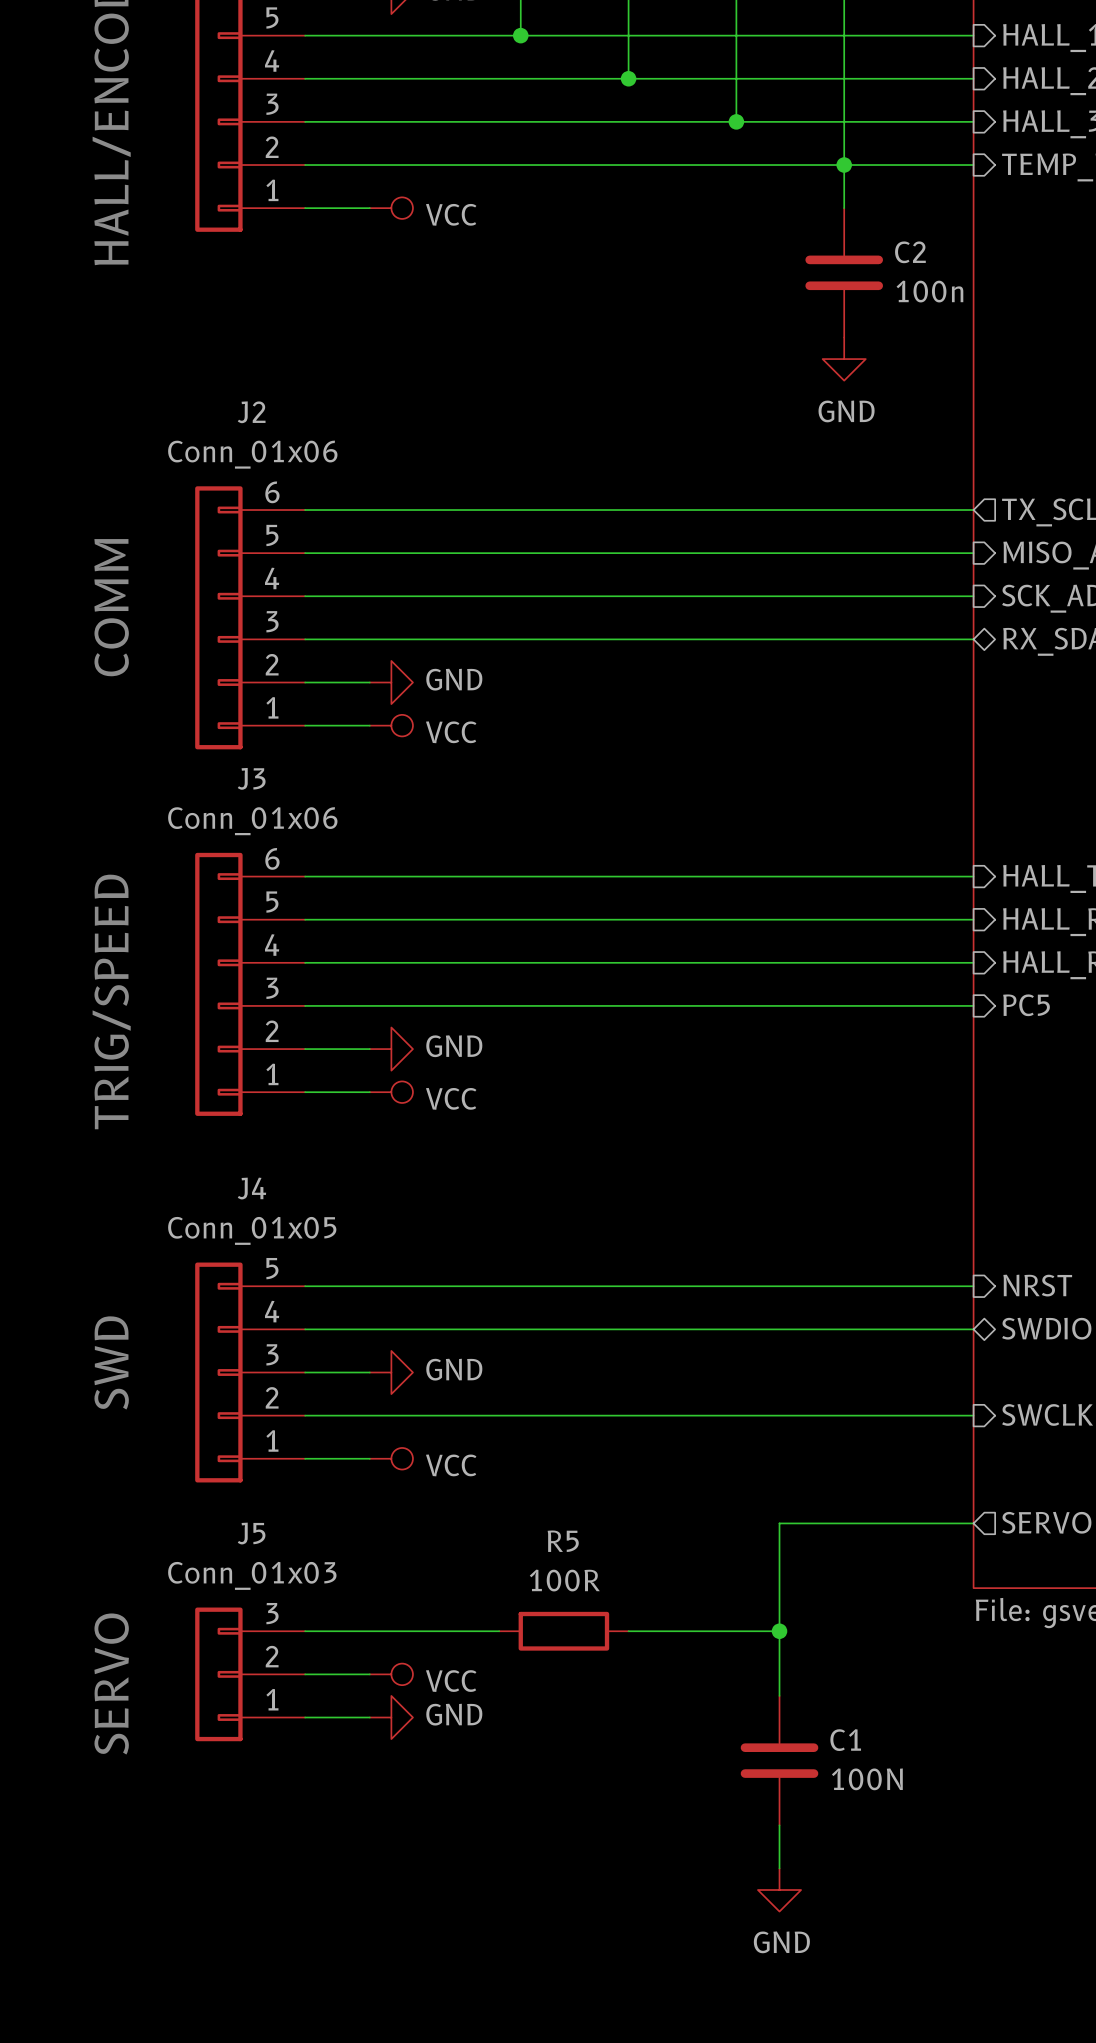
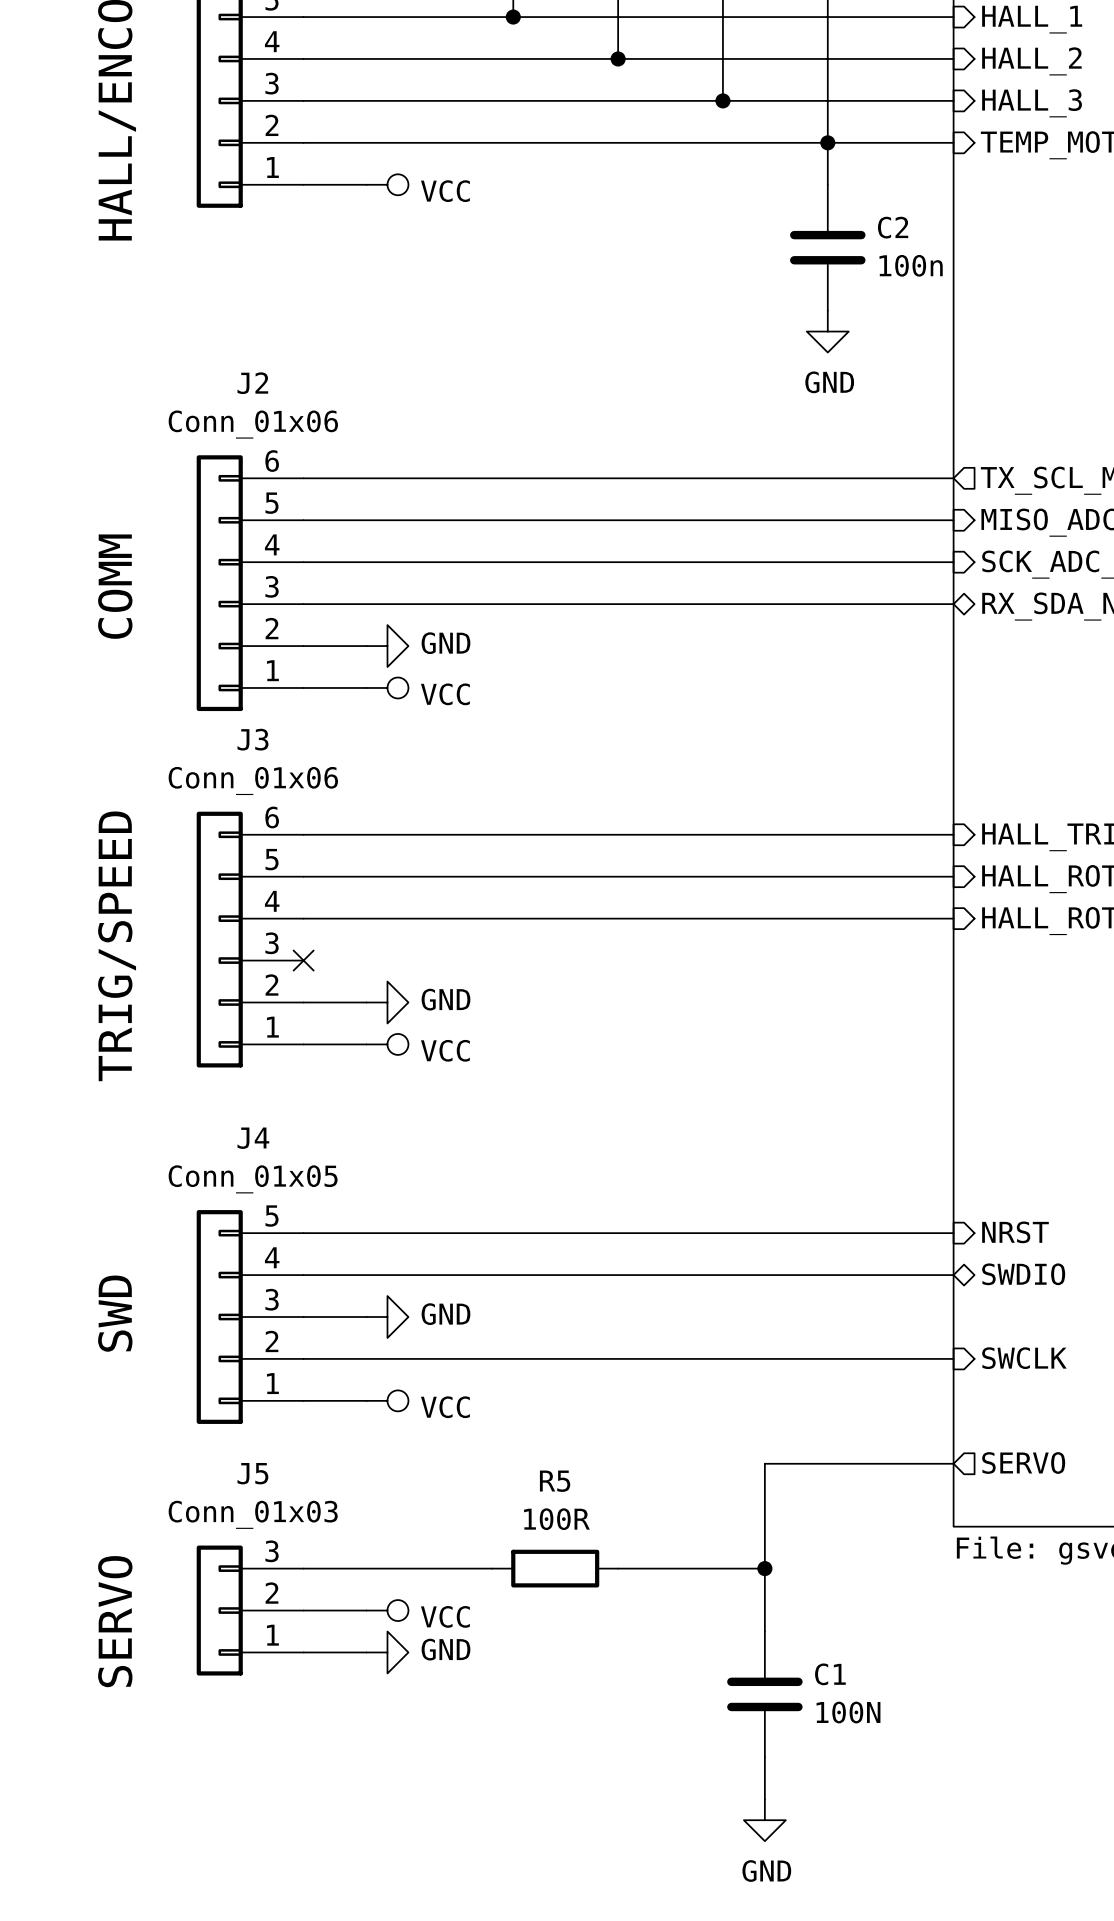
wire: (305, 1005) (973, 1005) -> none
no-connect mark: none -> (303, 960)
sheet pin: PC5 (1026, 1005) -> none

